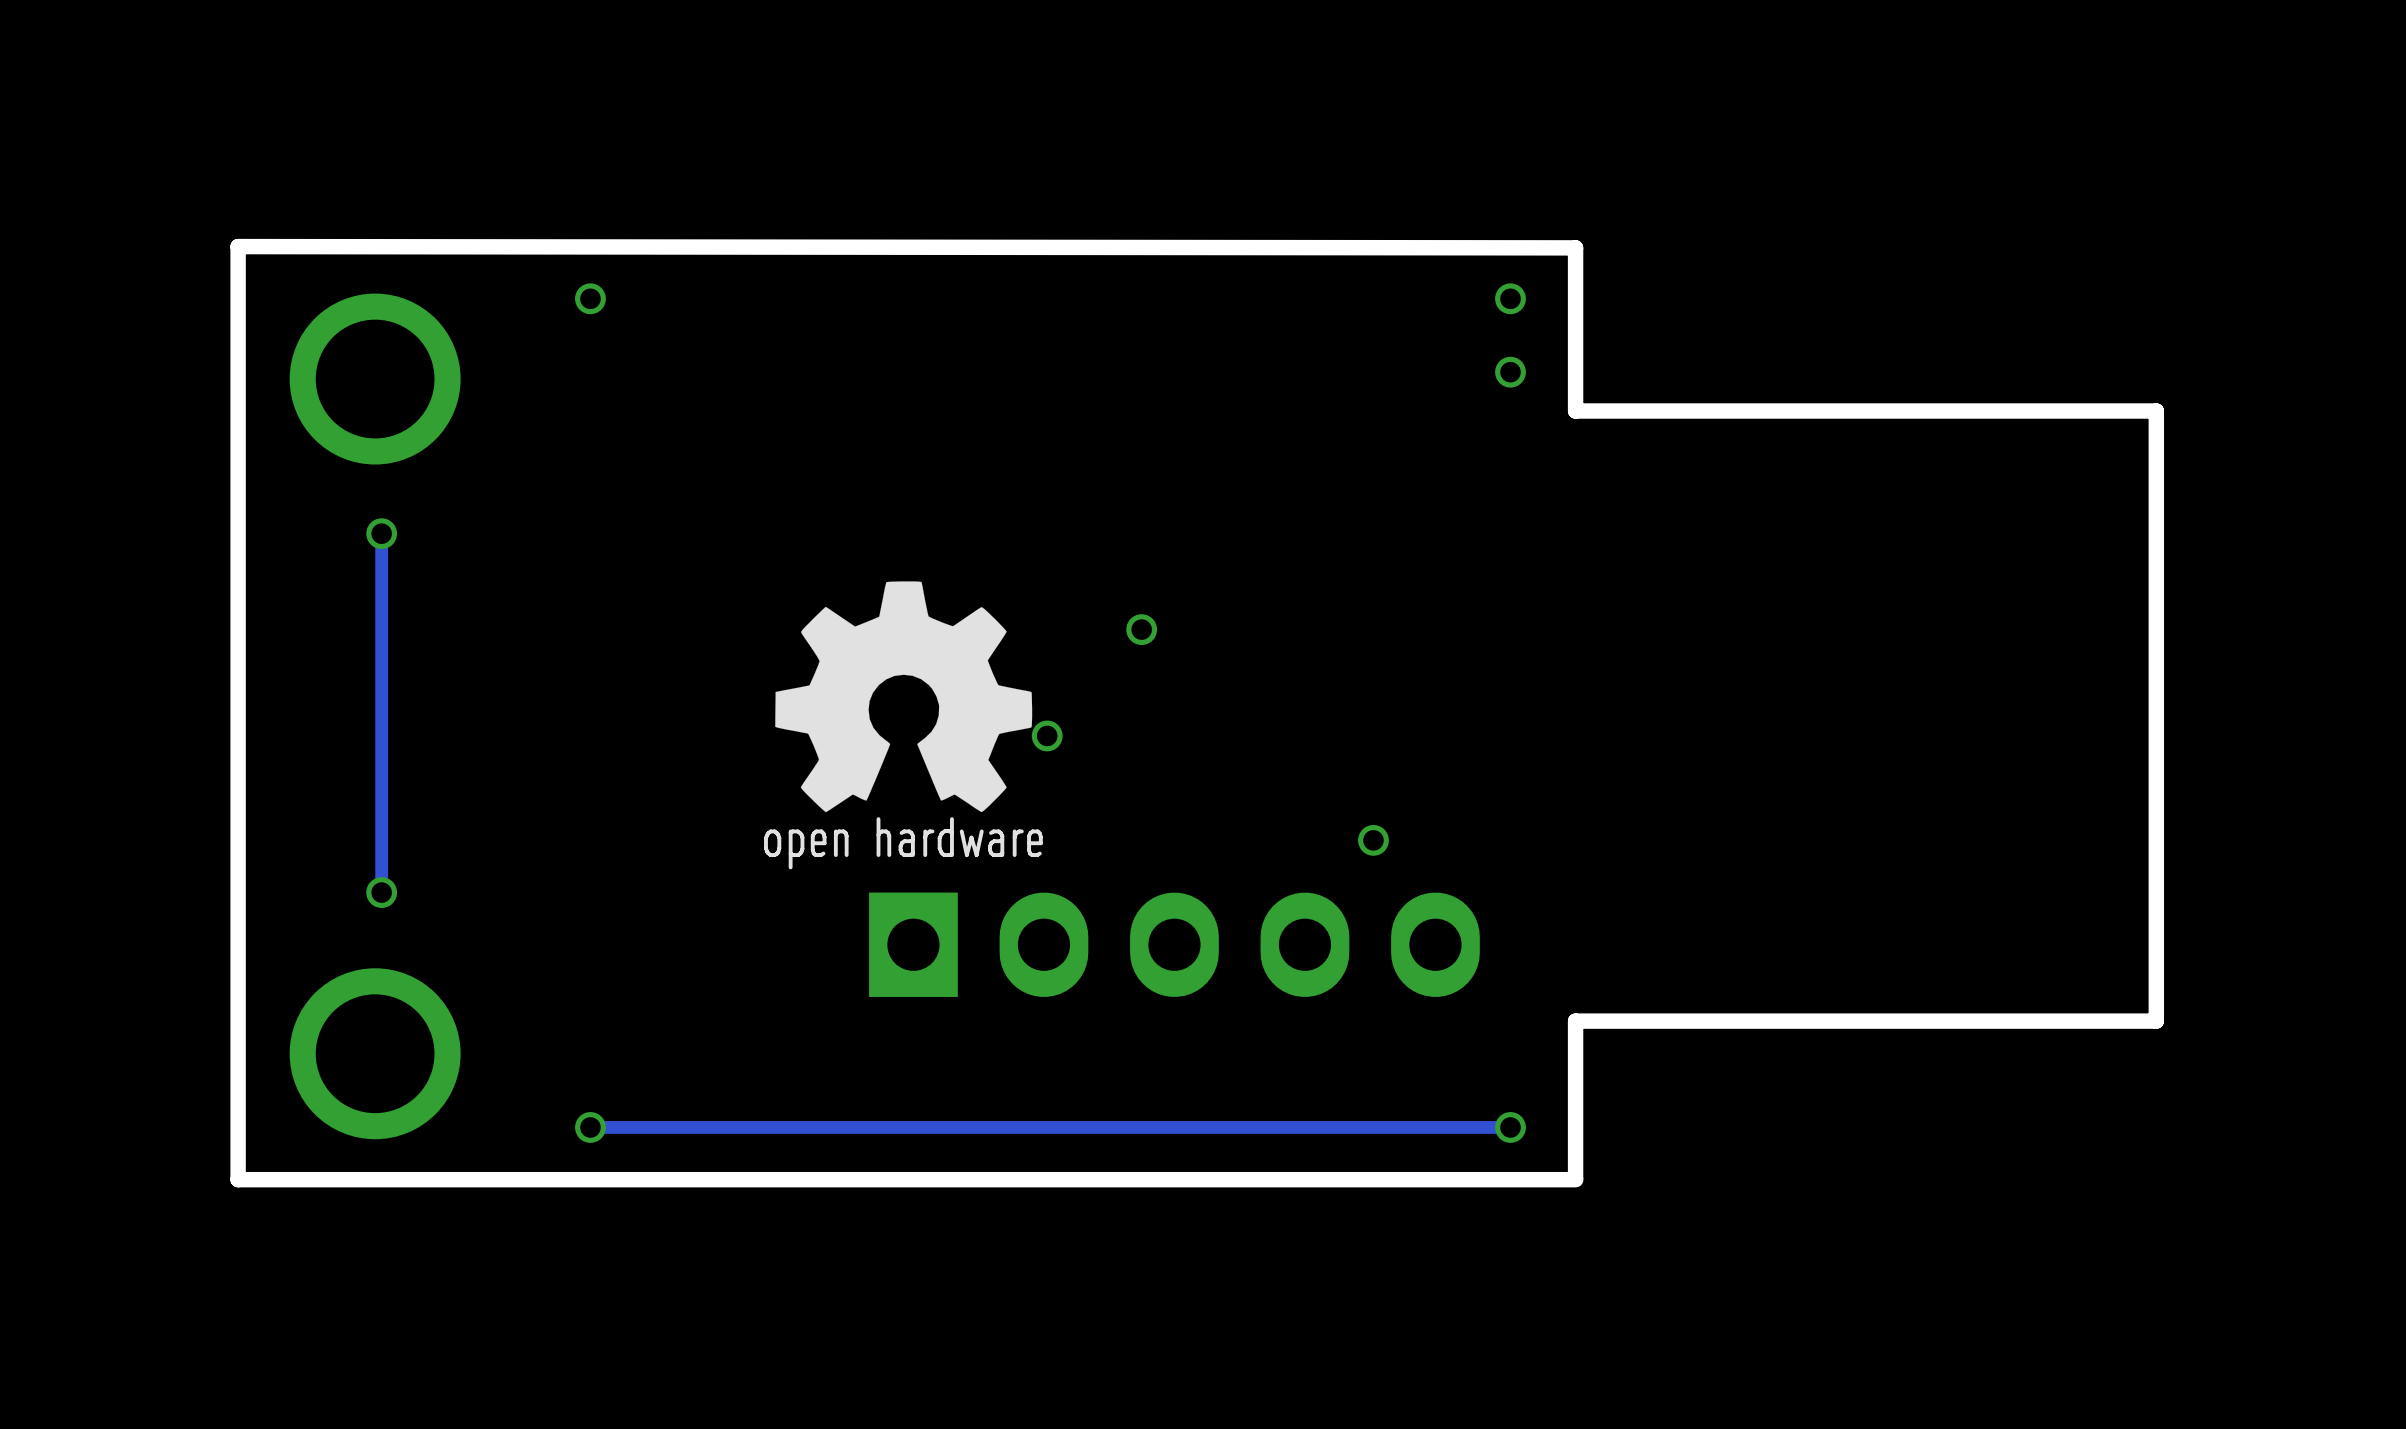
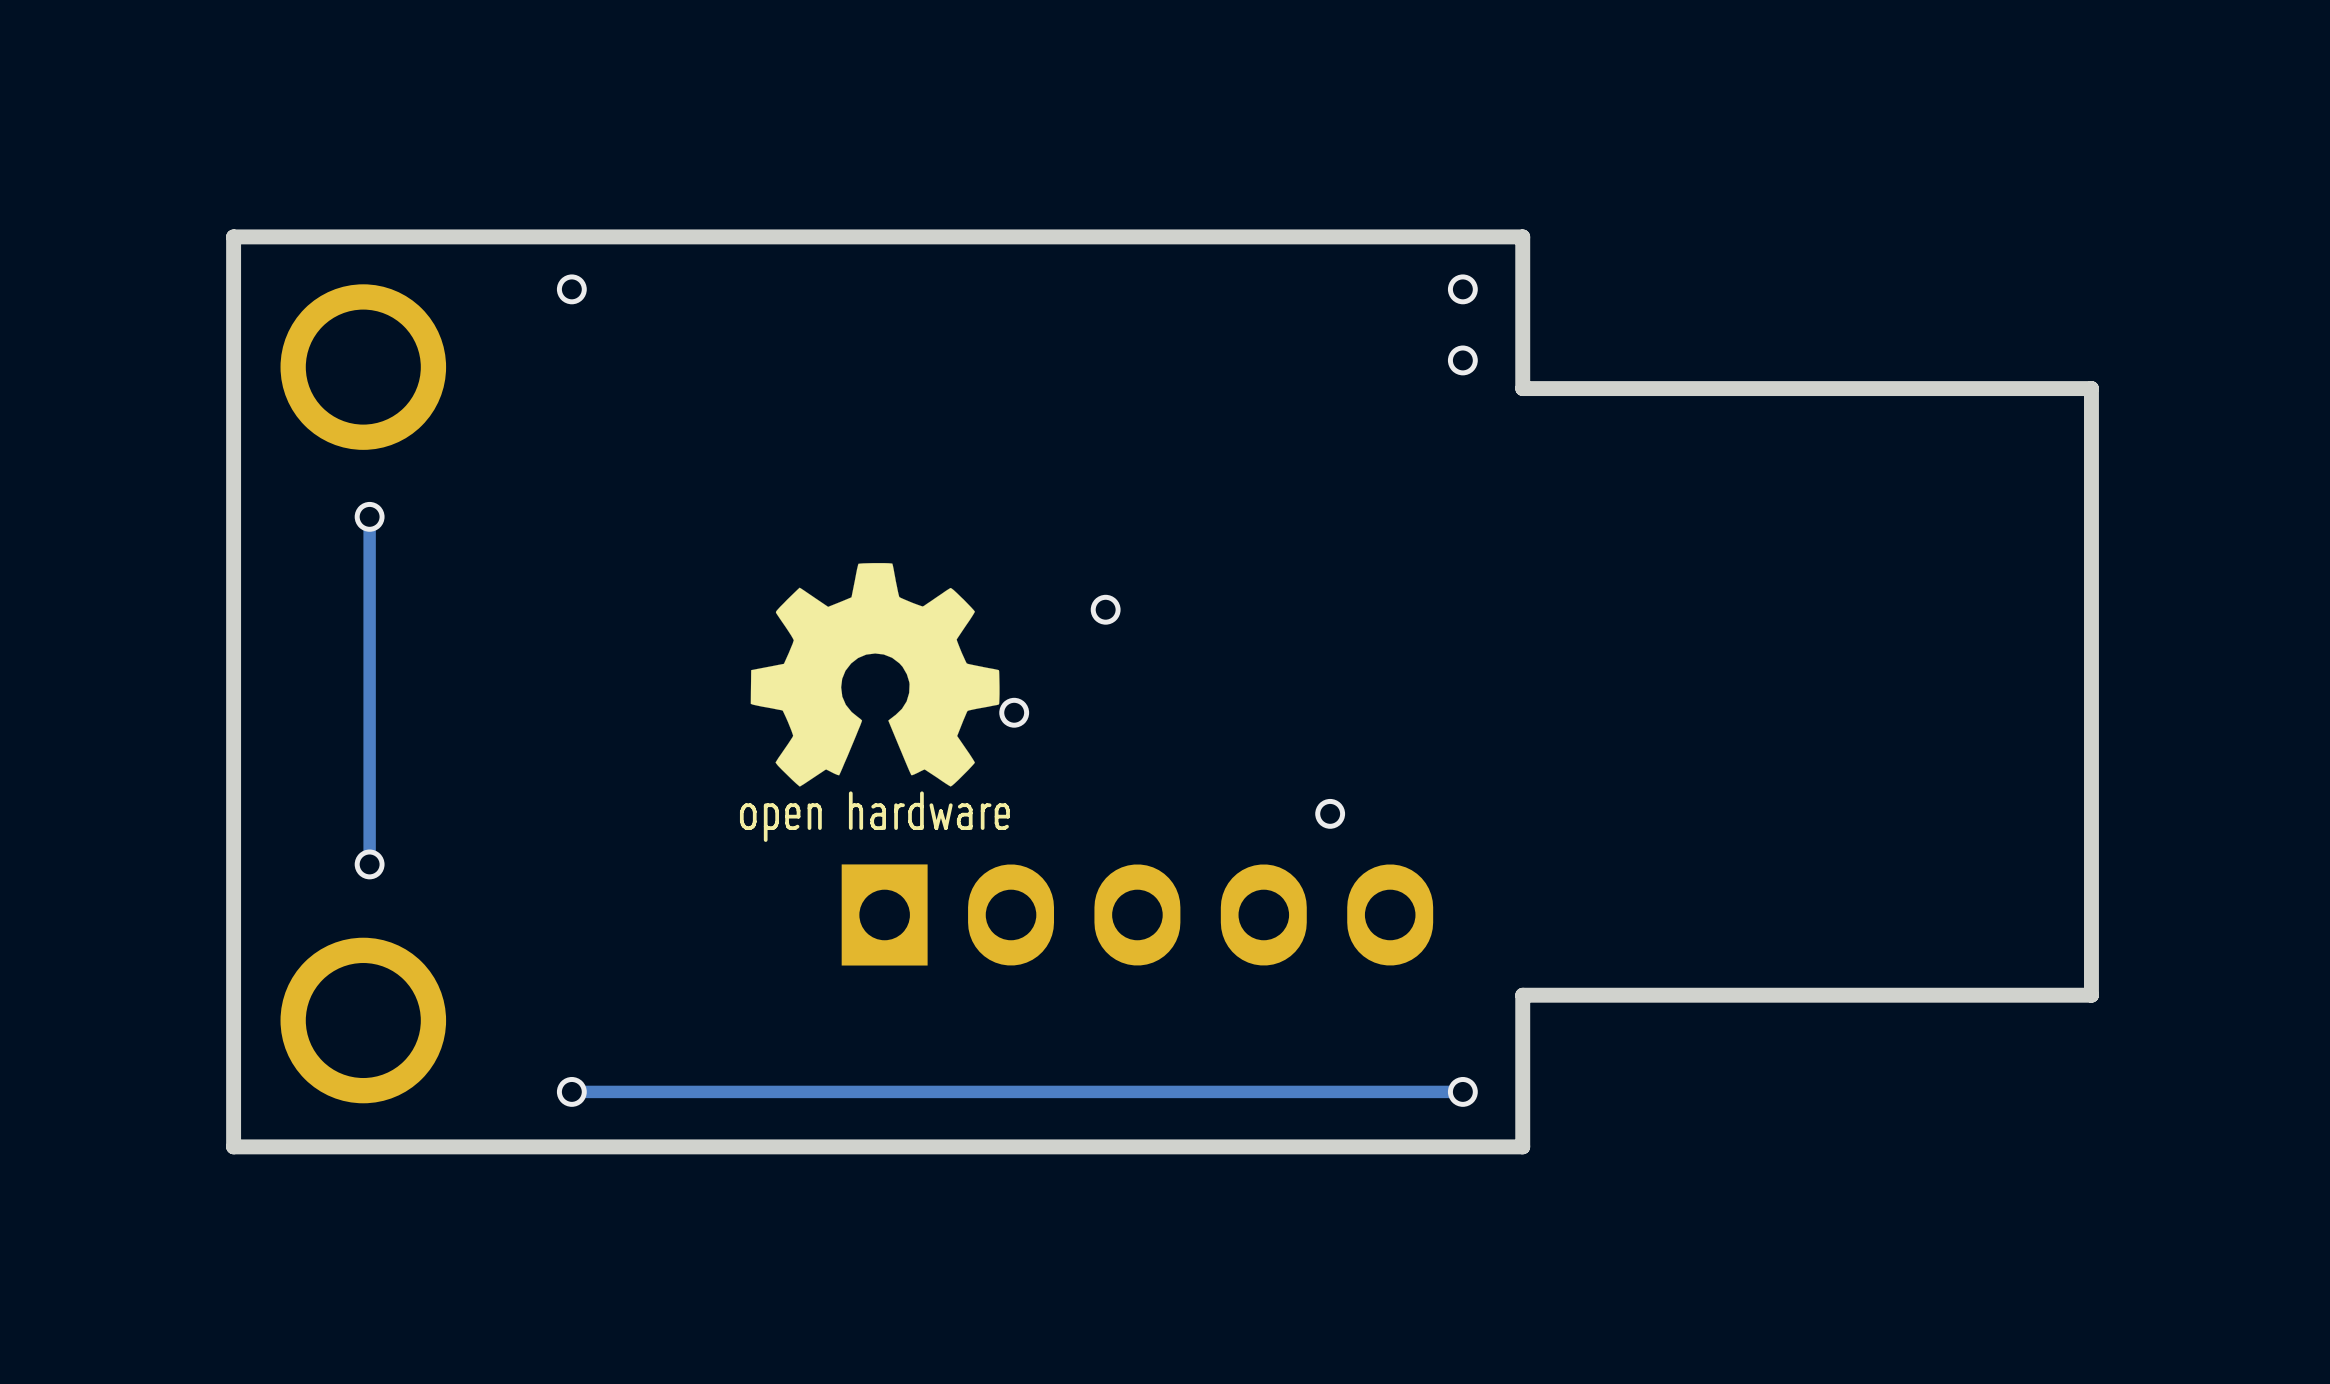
board edge: none -> (1522, 236) (1522, 388) (2091, 388) (2091, 995) (1522, 995) (1522, 1146) (233, 1146) (233, 236) (1522, 236)
board edge: (1575, 1177) (1575, 1021) (2156, 1021) (2156, 411) (1575, 411) (1575, 247) (238, 246) (238, 1179) (1575, 1179) -> none

